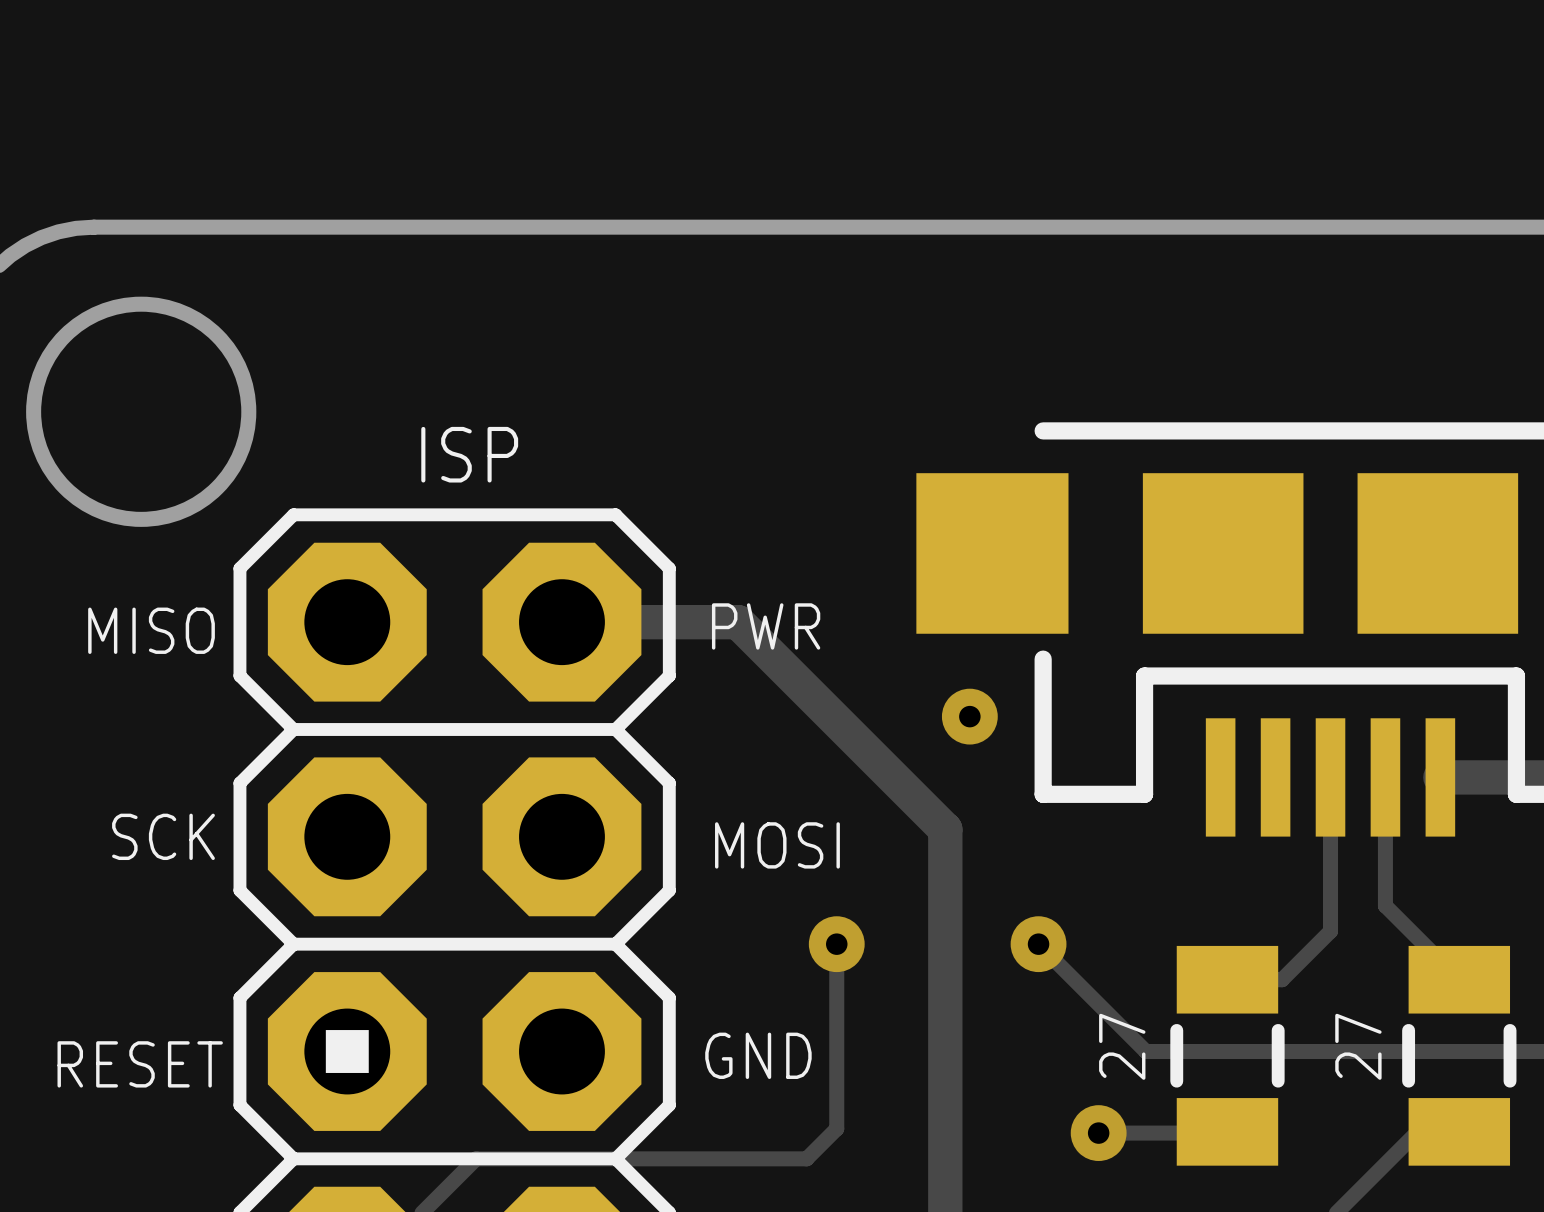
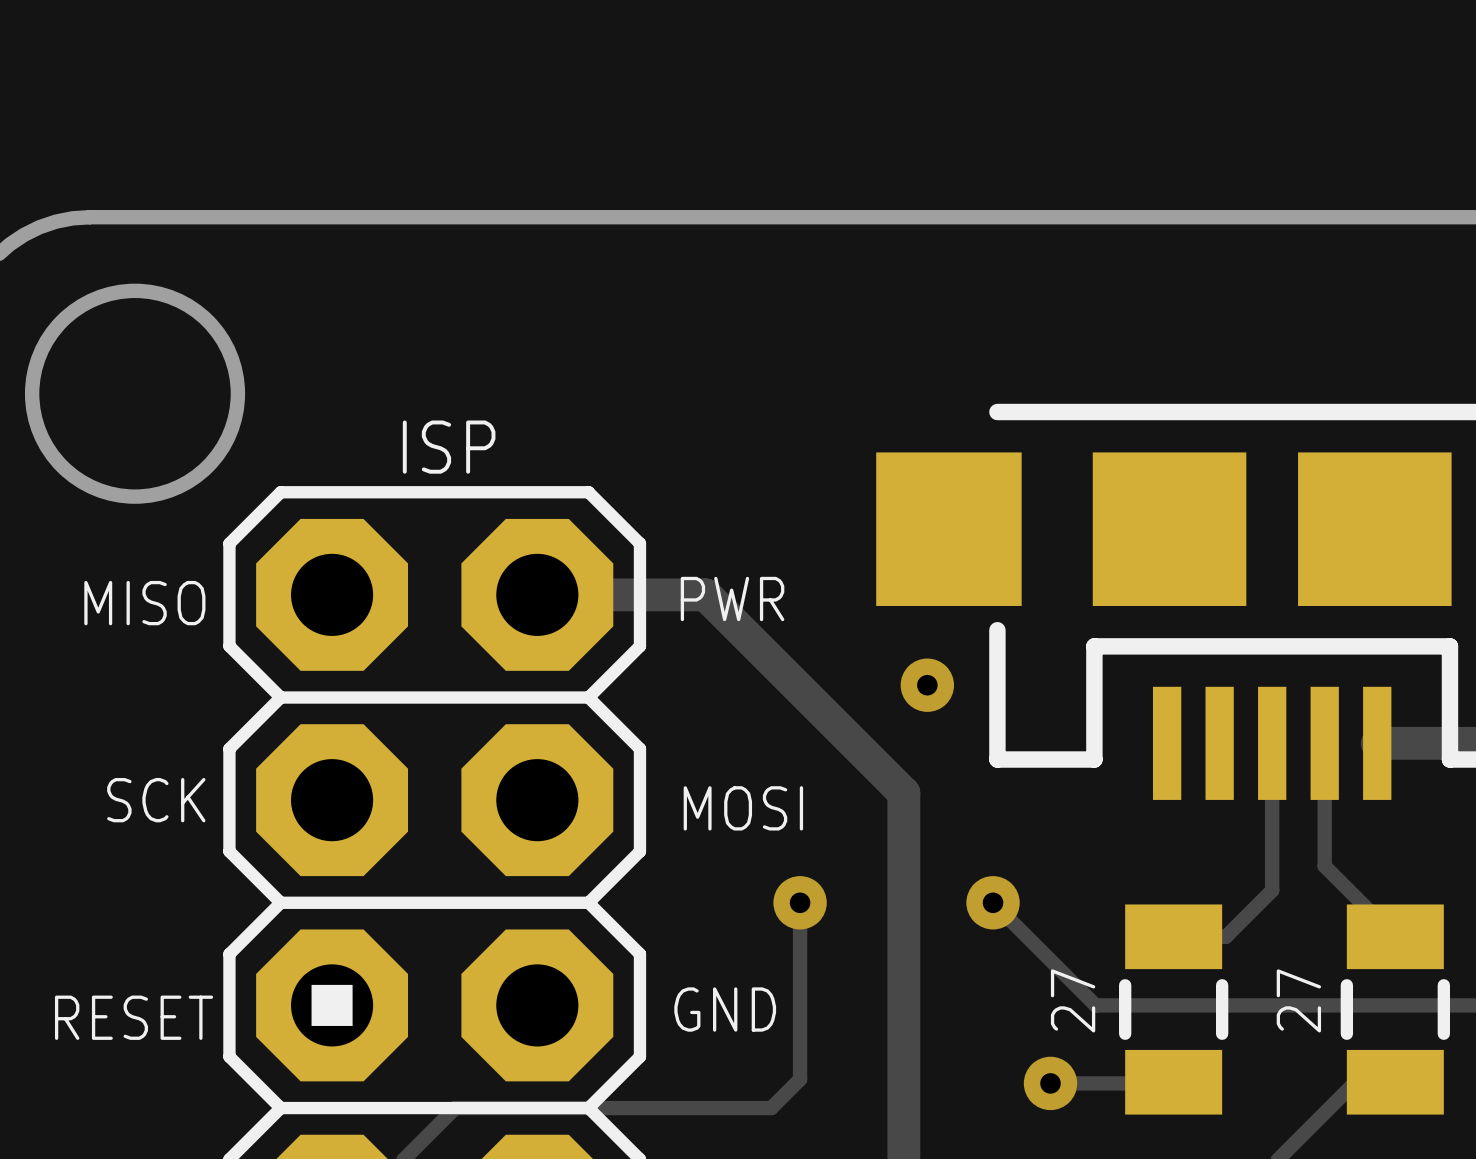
text position: ISP (469, 454) -> ISP (449, 447)

